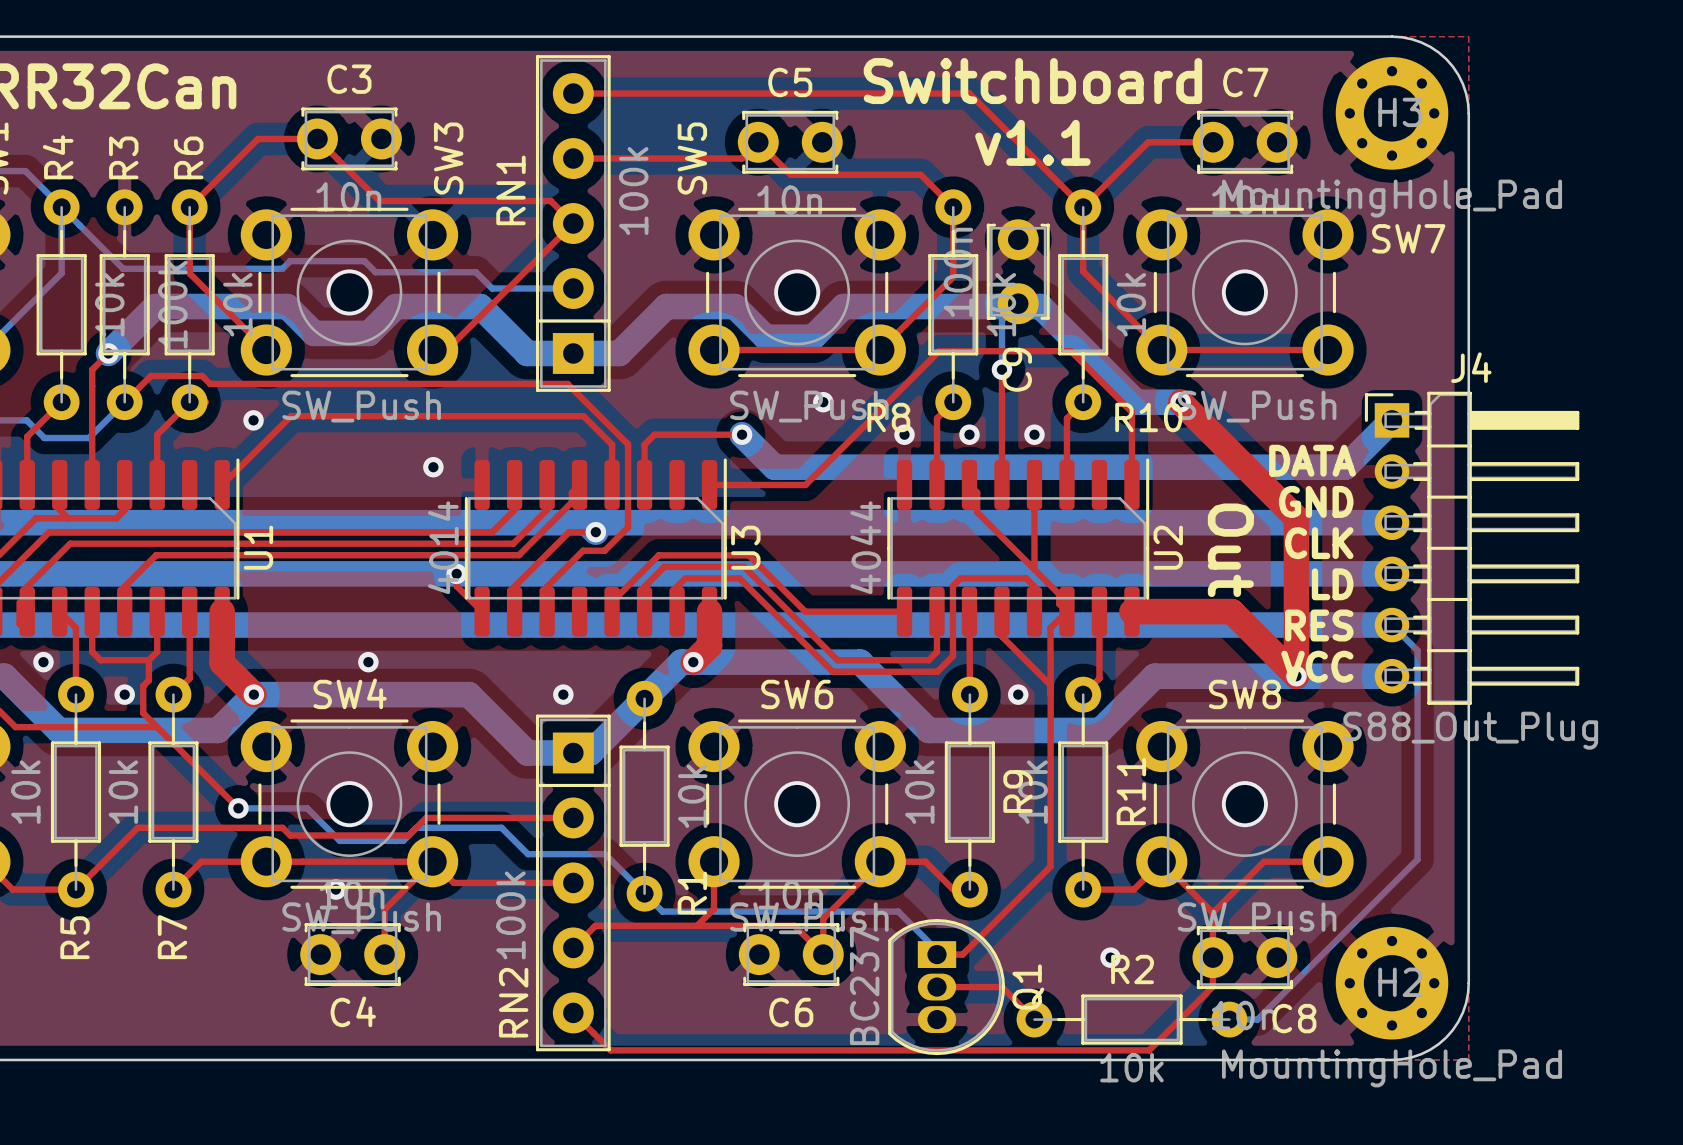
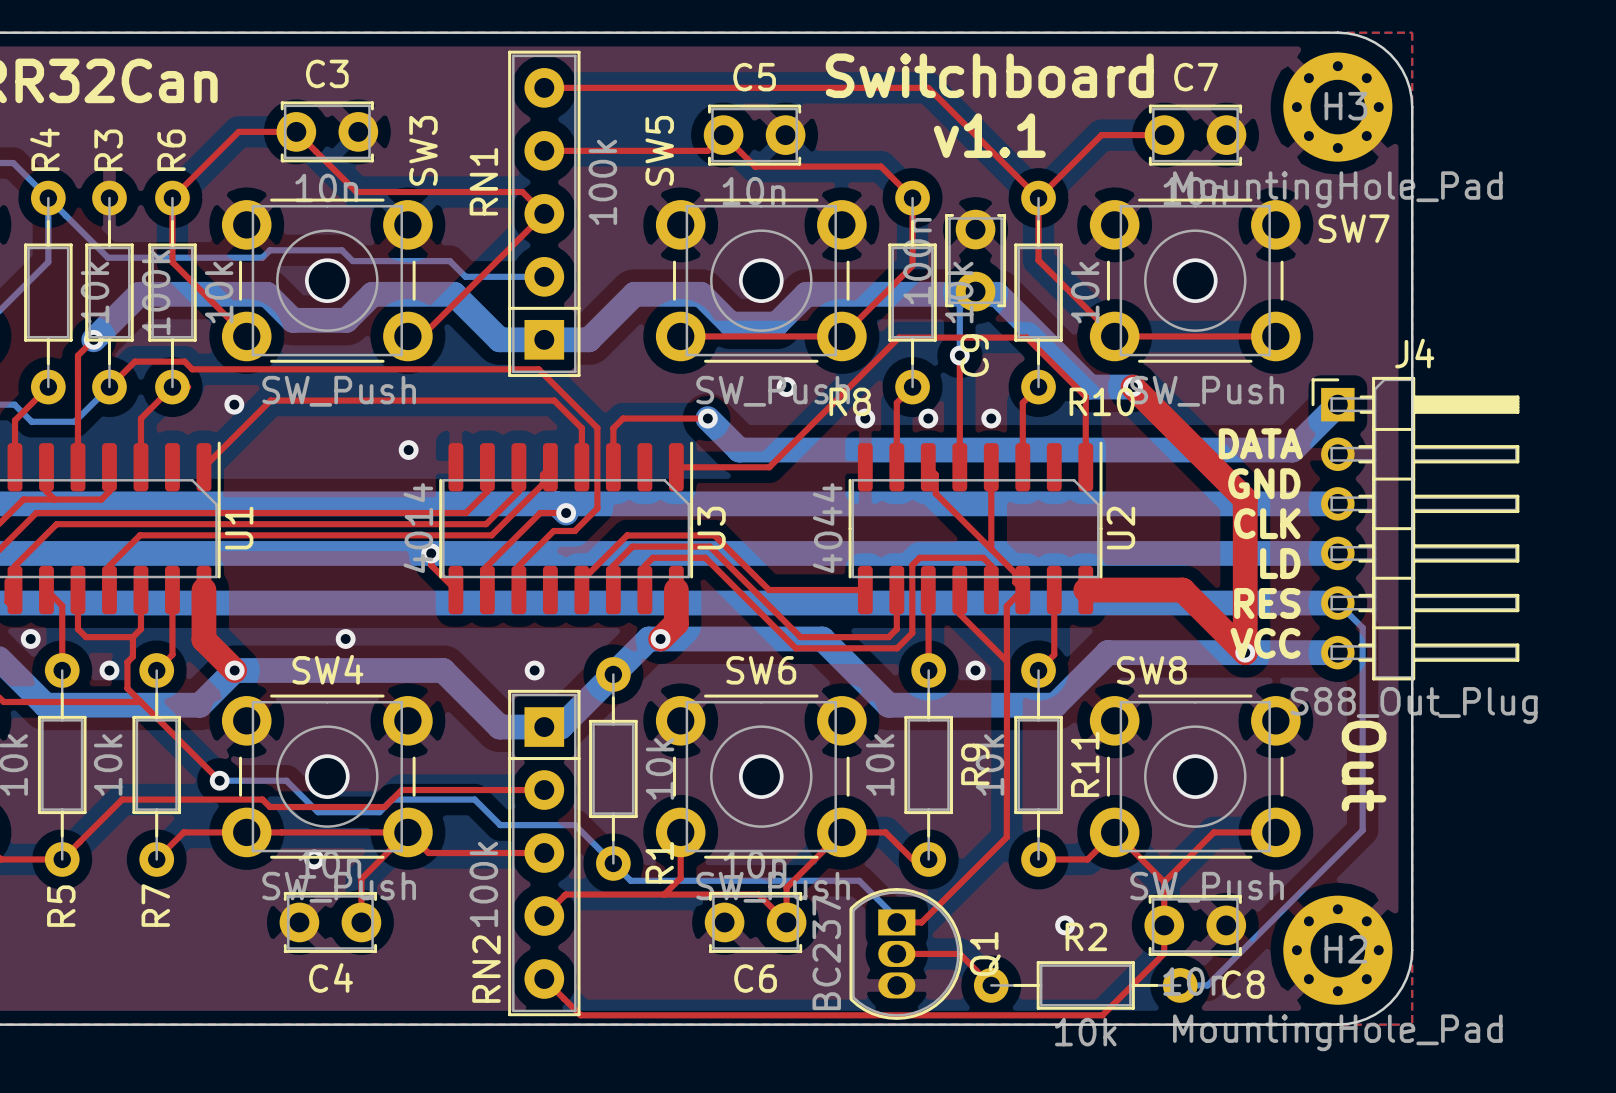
text position: Out (1230, 550) -> Out (1364, 766)
SW8 name position: SW8 (1244, 694) -> SW8 (1151, 670)

